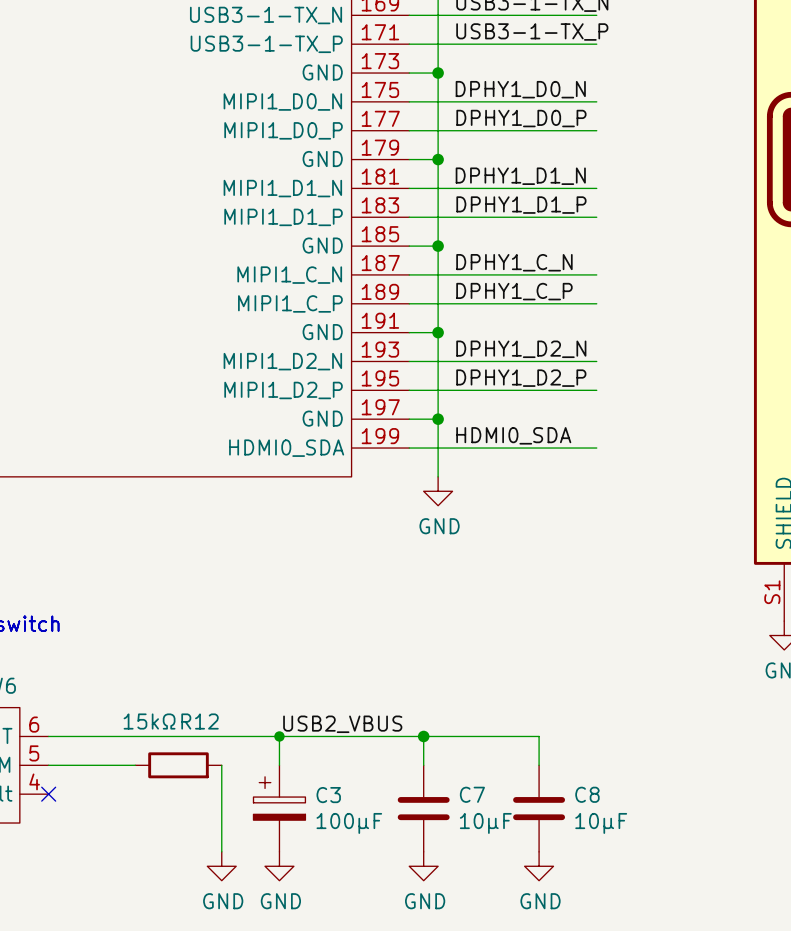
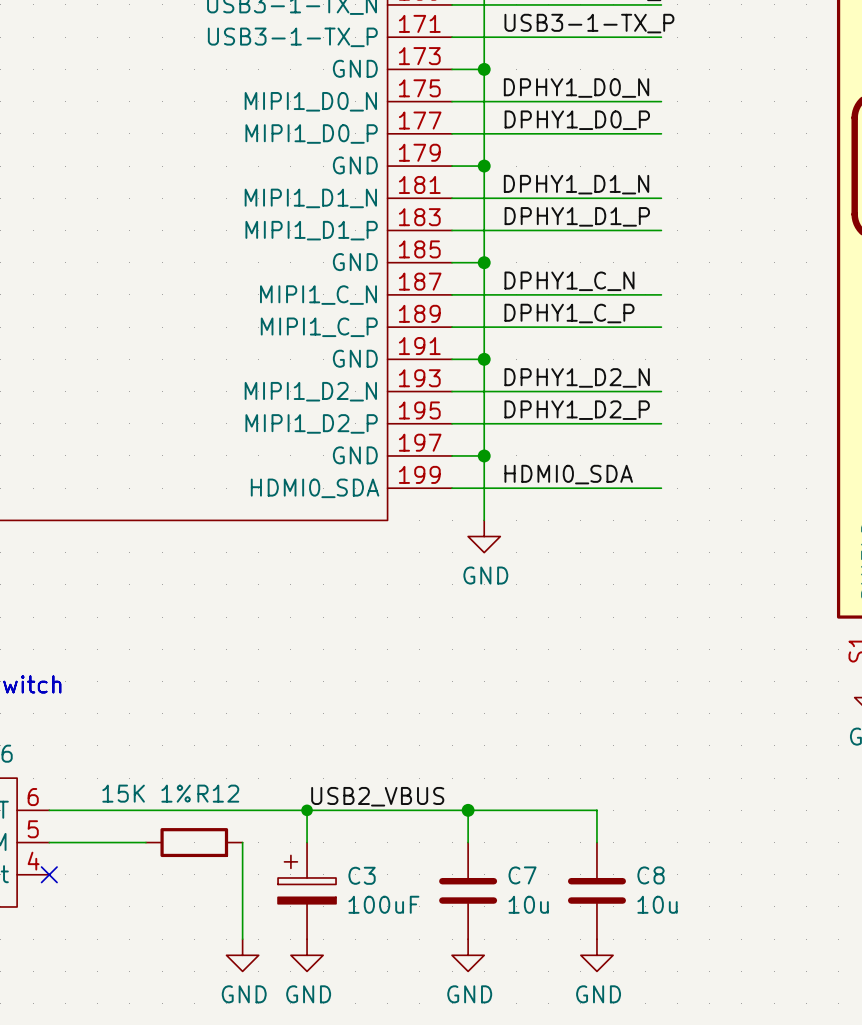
R12 value: 15kΩ (149, 721) -> 15K 1% (146, 793)
C3 value: 100µF (349, 823) -> 100uF (383, 904)
C7 value: 10µF (485, 823) -> 10u (528, 904)
C8 value: 10µF (601, 823) -> 10u (657, 904)

